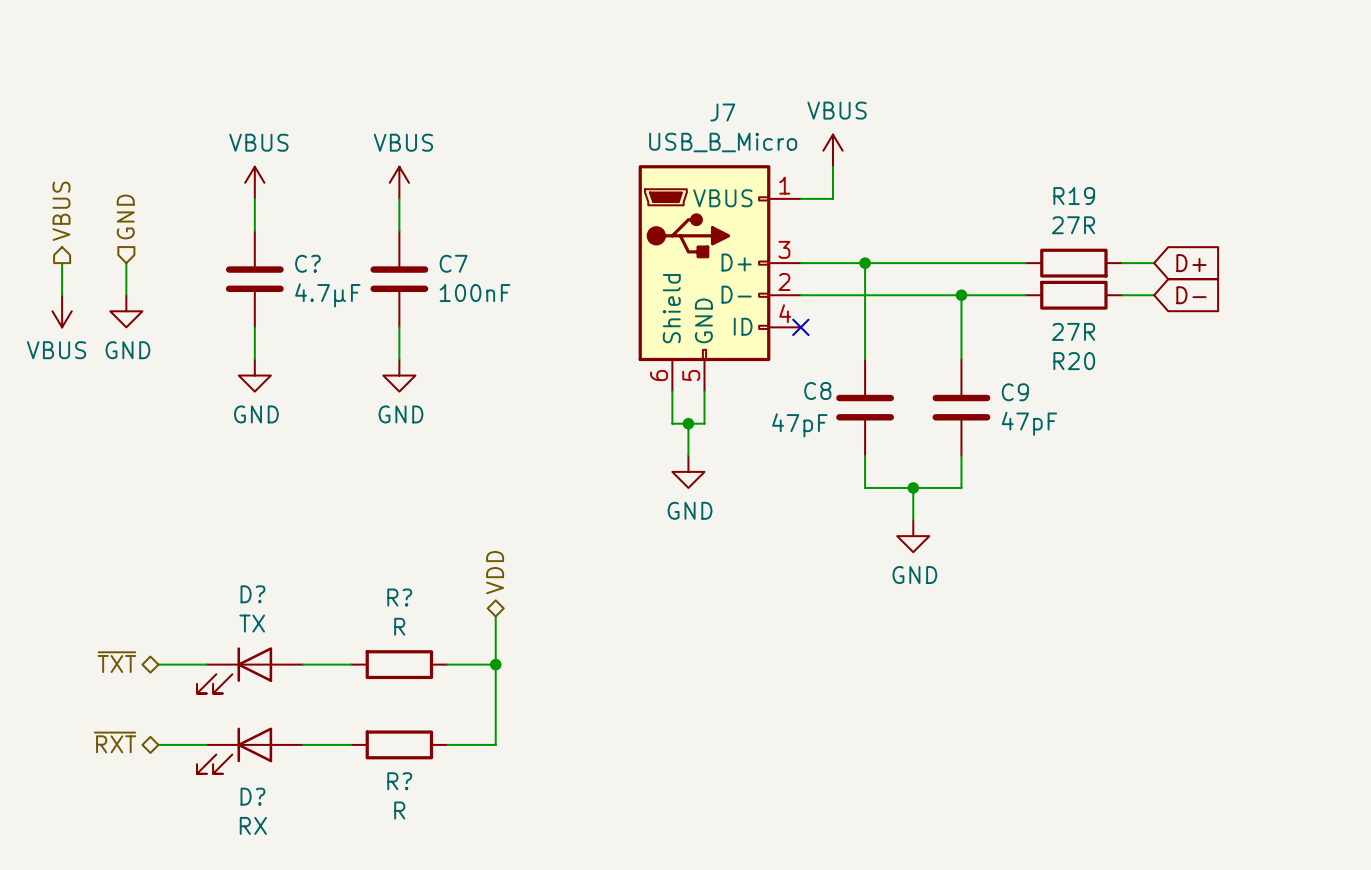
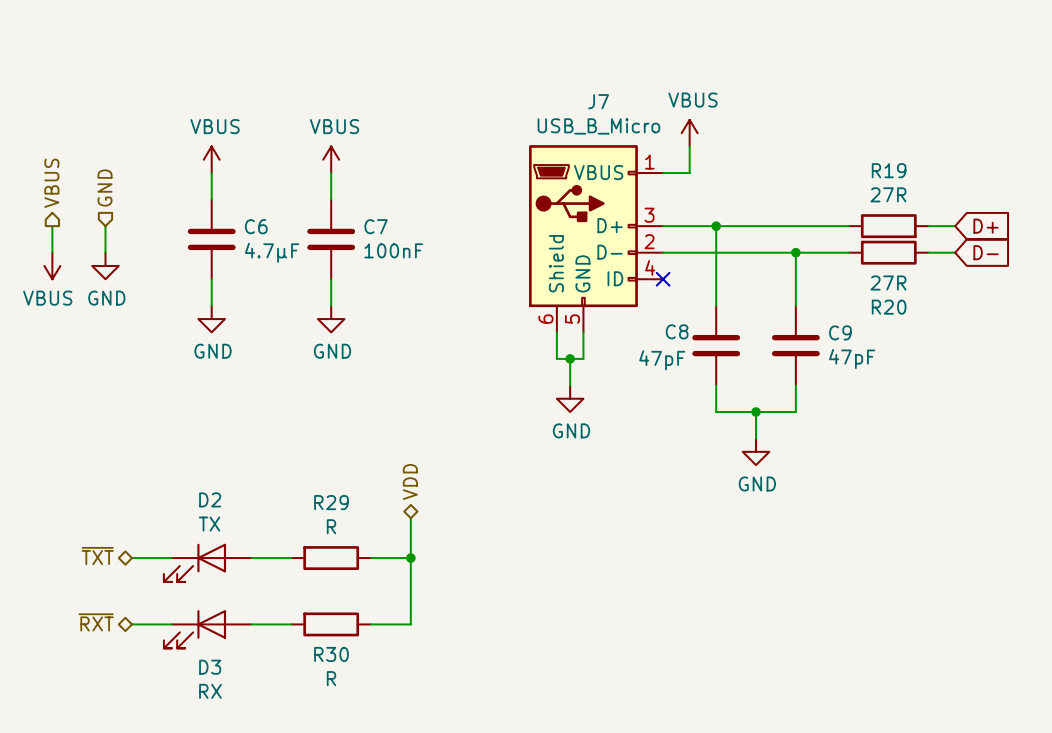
C? name: C? (307, 263) -> C6 (256, 226)
D? name: D? (252, 594) -> D2 (210, 499)
R? name: R? (399, 597) -> R29 (331, 502)
R? name: R? (399, 781) -> R30 (331, 654)
D? name: D? (252, 796) -> D3 (210, 667)

